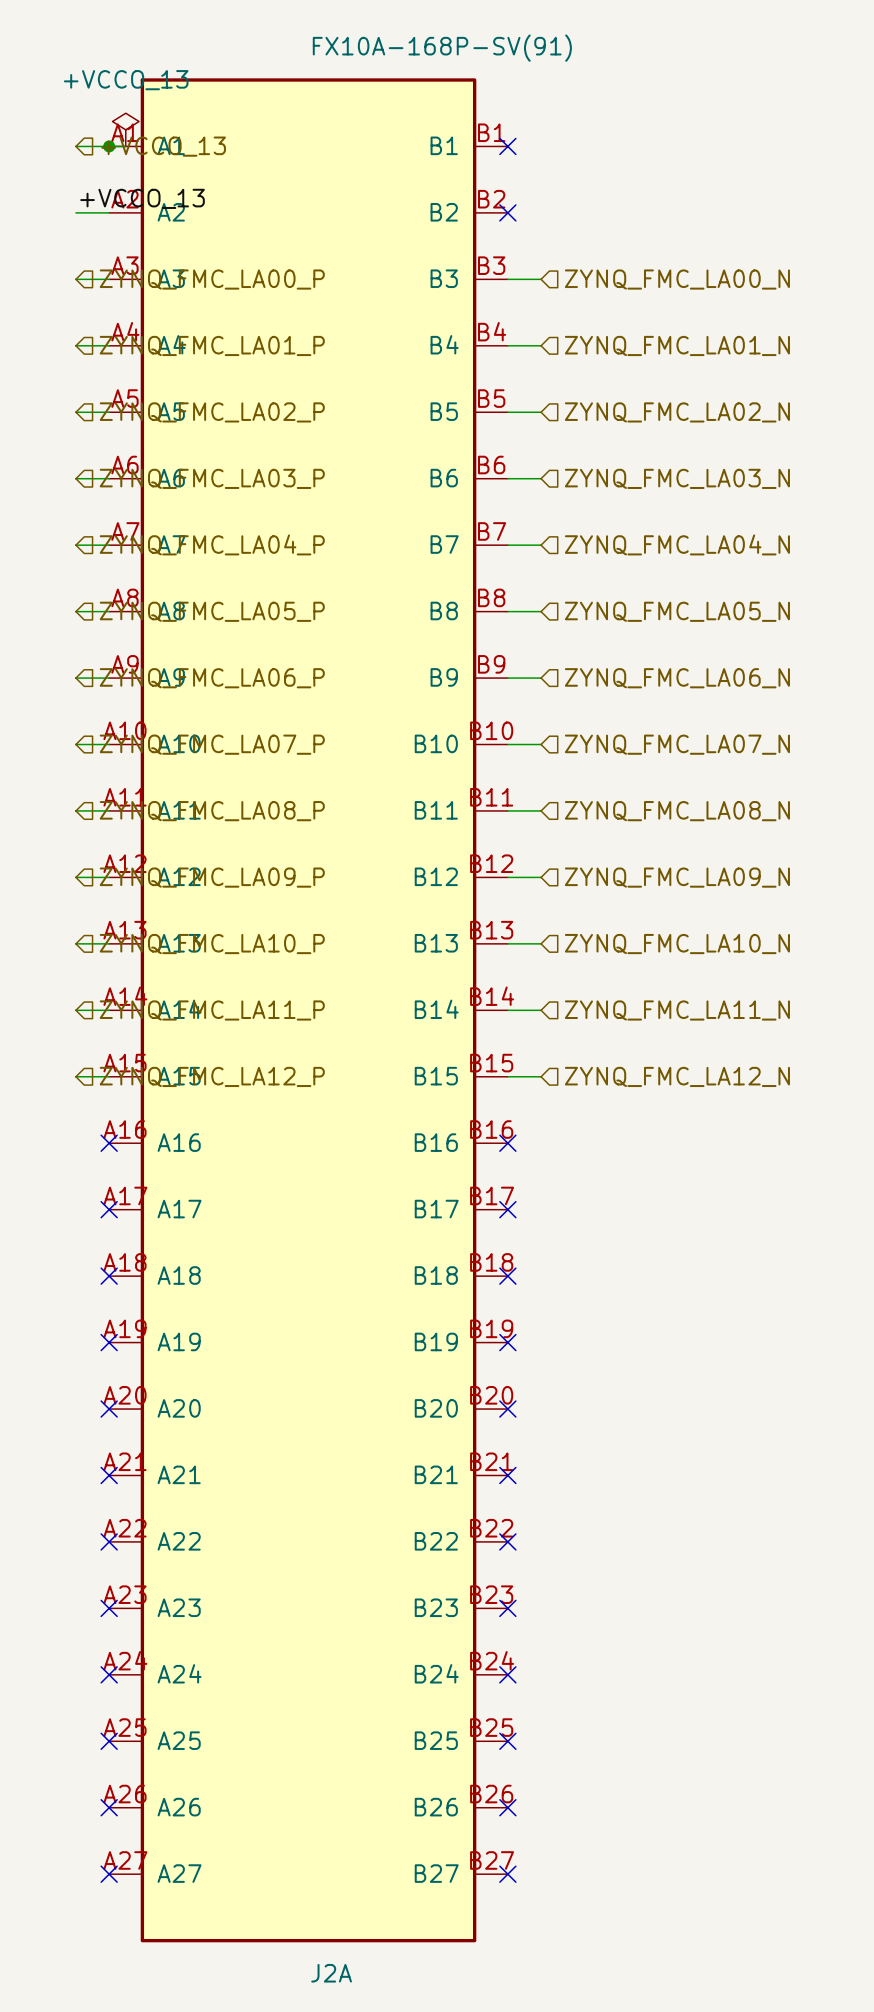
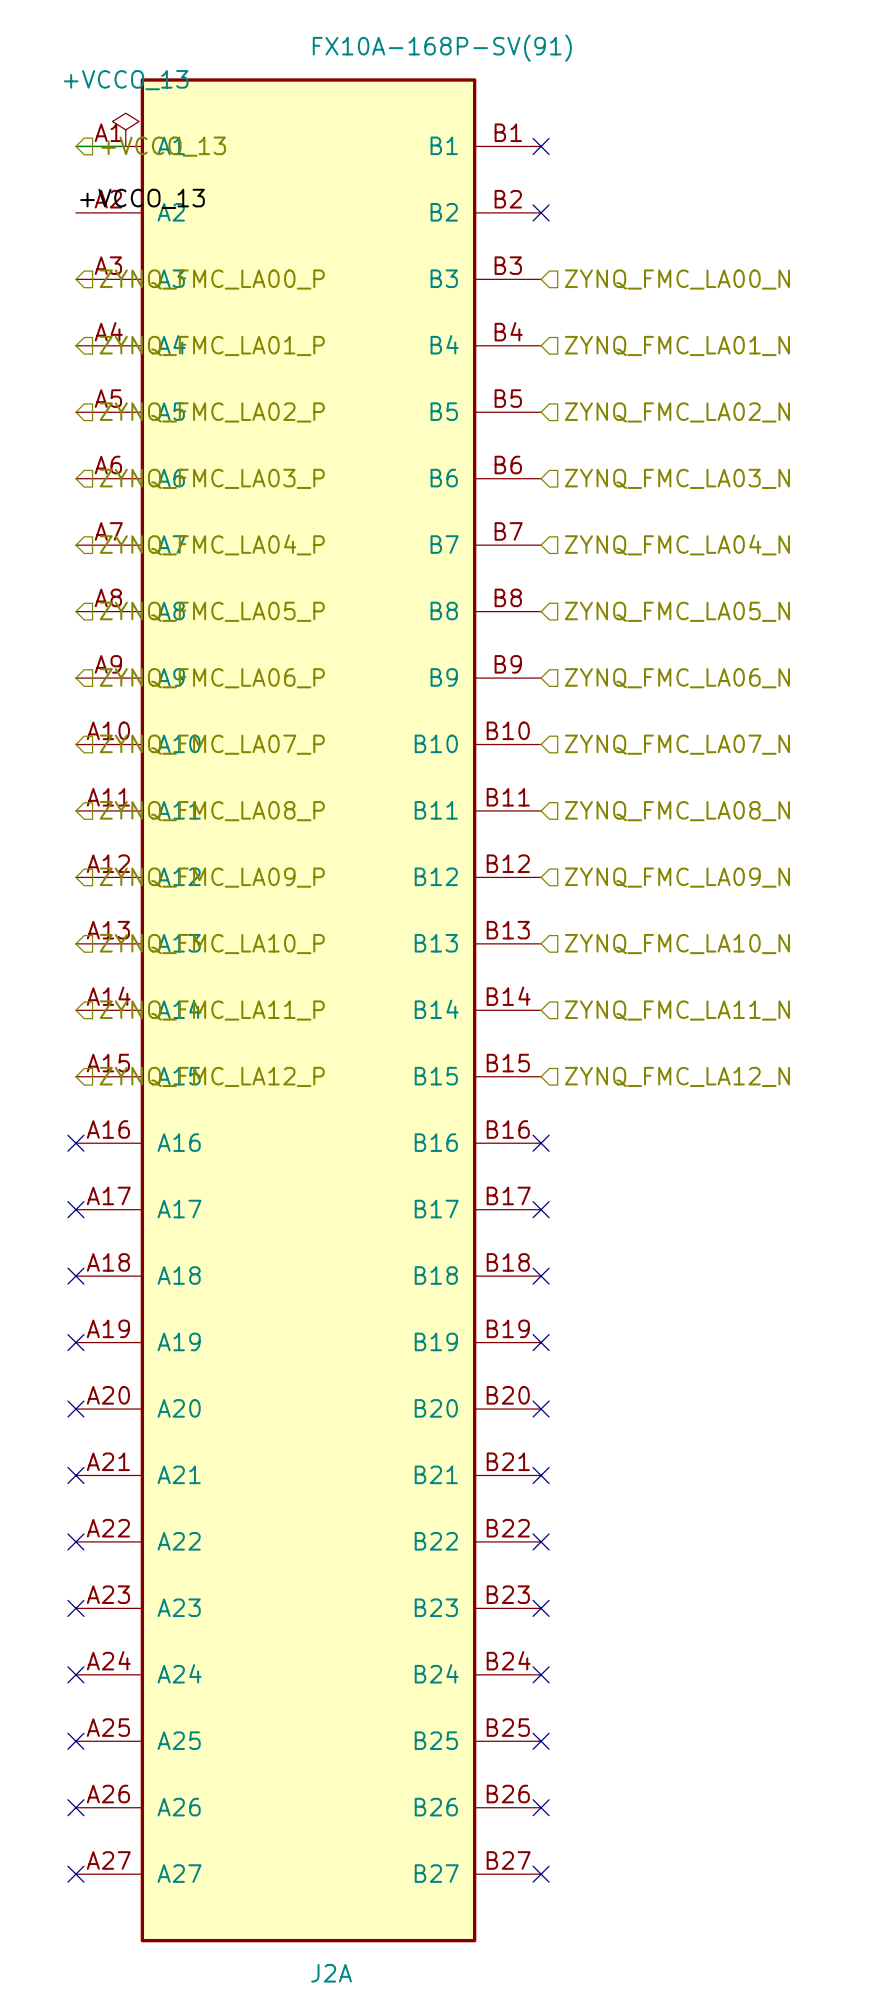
J2A symbol: [109, 78, 508, 1943] -> [75, 78, 542, 1943]
junction: (109, 146) -> none
no-connect mark position: (507, 146) -> (541, 146)
no-connect mark position: (507, 212) -> (541, 212)
no-connect mark position: (109, 1143) -> (75, 1143)
no-connect mark position: (507, 1143) -> (541, 1143)
no-connect mark position: (109, 1209) -> (75, 1209)
no-connect mark position: (507, 1209) -> (541, 1209)
no-connect mark position: (109, 1276) -> (75, 1276)
no-connect mark position: (507, 1276) -> (541, 1276)
no-connect mark position: (109, 1342) -> (75, 1342)
no-connect mark position: (507, 1342) -> (541, 1342)
no-connect mark position: (109, 1409) -> (75, 1409)
no-connect mark position: (507, 1409) -> (541, 1409)
no-connect mark position: (109, 1475) -> (75, 1475)
no-connect mark position: (507, 1475) -> (541, 1475)
no-connect mark position: (109, 1541) -> (75, 1541)
no-connect mark position: (507, 1541) -> (541, 1541)
no-connect mark position: (109, 1608) -> (75, 1608)
no-connect mark position: (507, 1608) -> (541, 1608)
no-connect mark position: (109, 1674) -> (75, 1674)
no-connect mark position: (507, 1674) -> (541, 1674)
no-connect mark position: (109, 1741) -> (75, 1741)
no-connect mark position: (507, 1741) -> (541, 1741)
no-connect mark position: (109, 1807) -> (75, 1807)
no-connect mark position: (507, 1807) -> (541, 1807)
no-connect mark position: (109, 1874) -> (75, 1874)
no-connect mark position: (507, 1874) -> (541, 1874)

